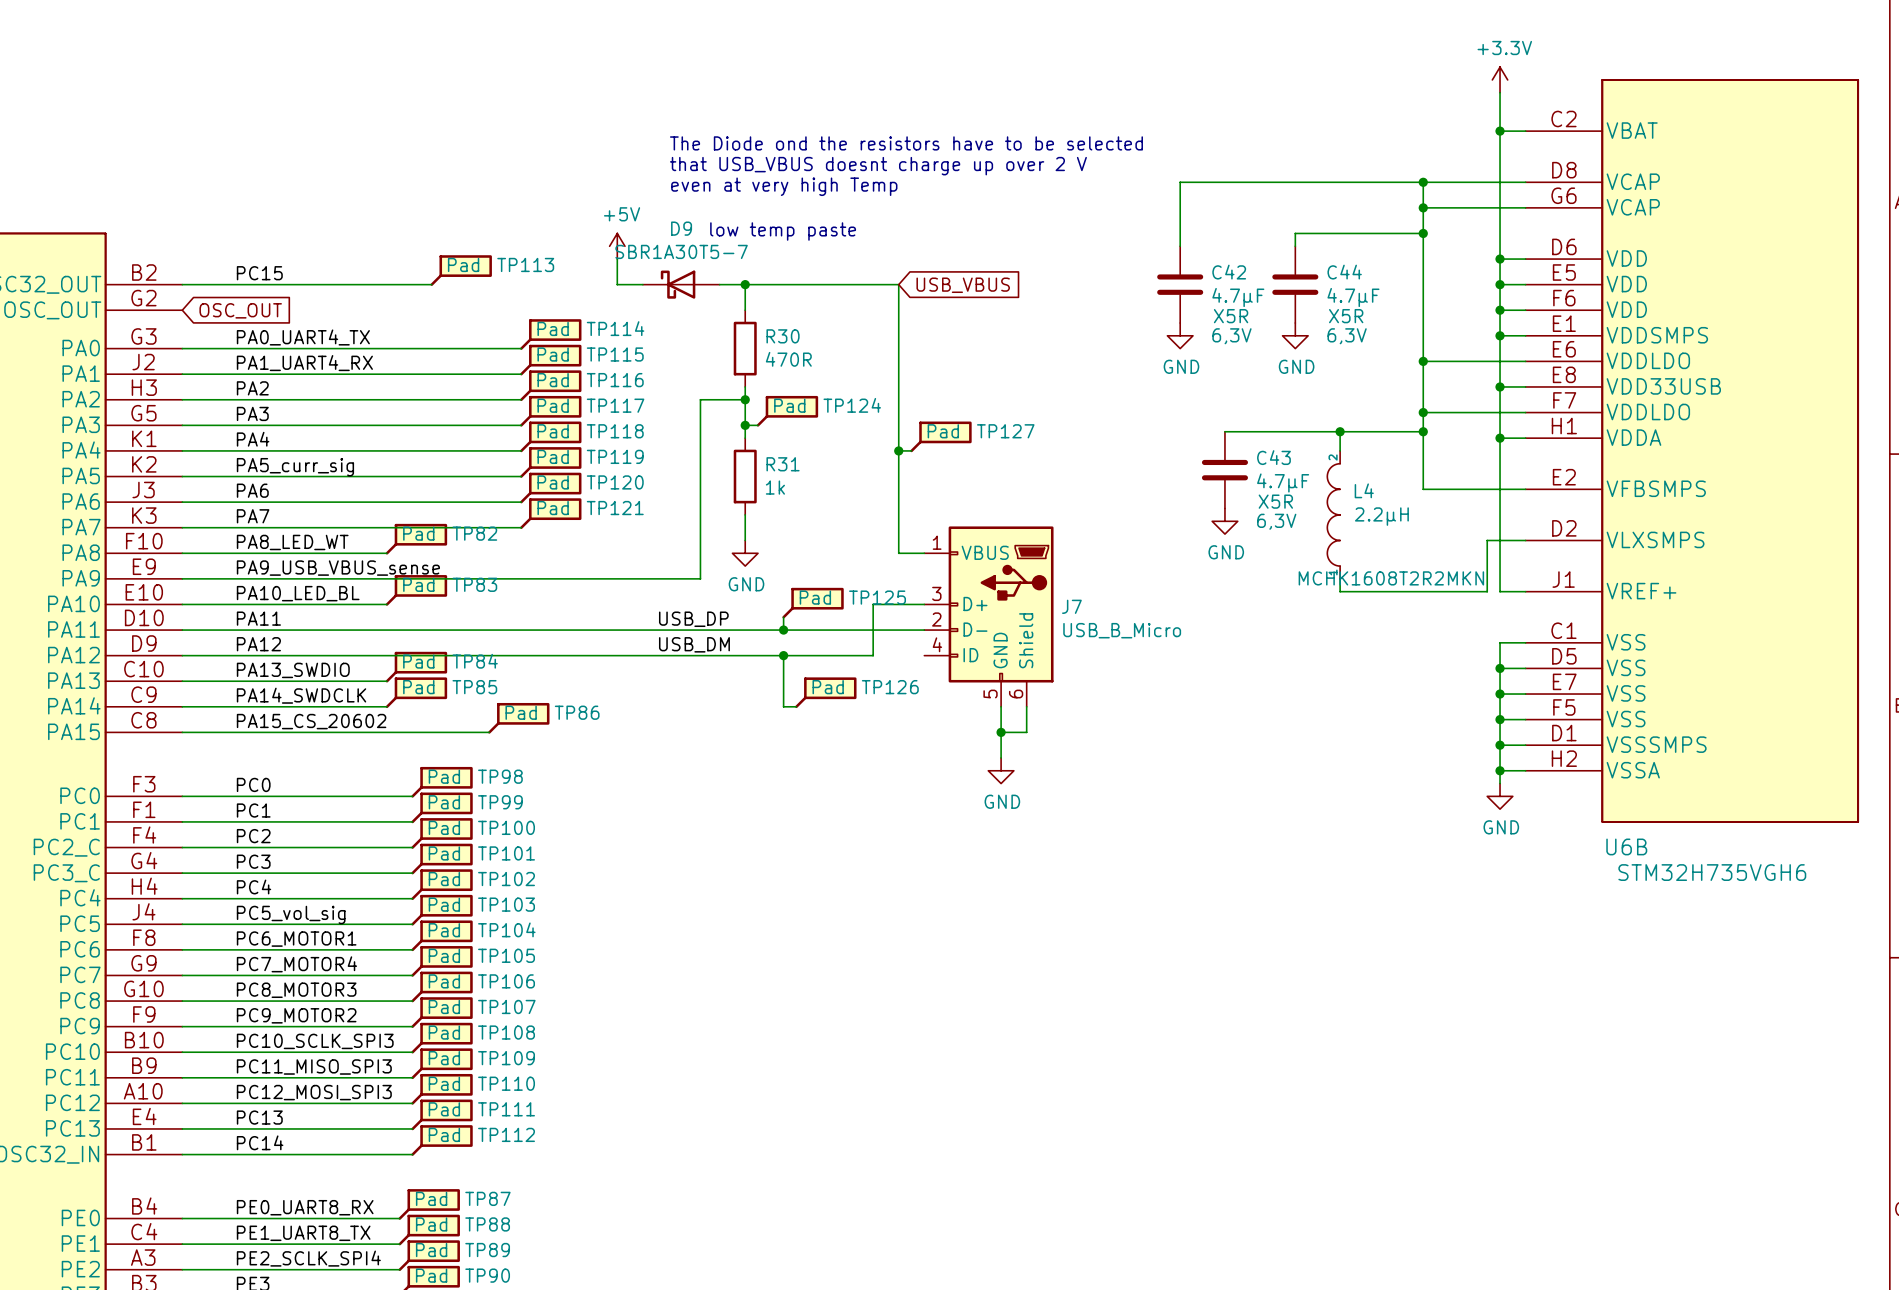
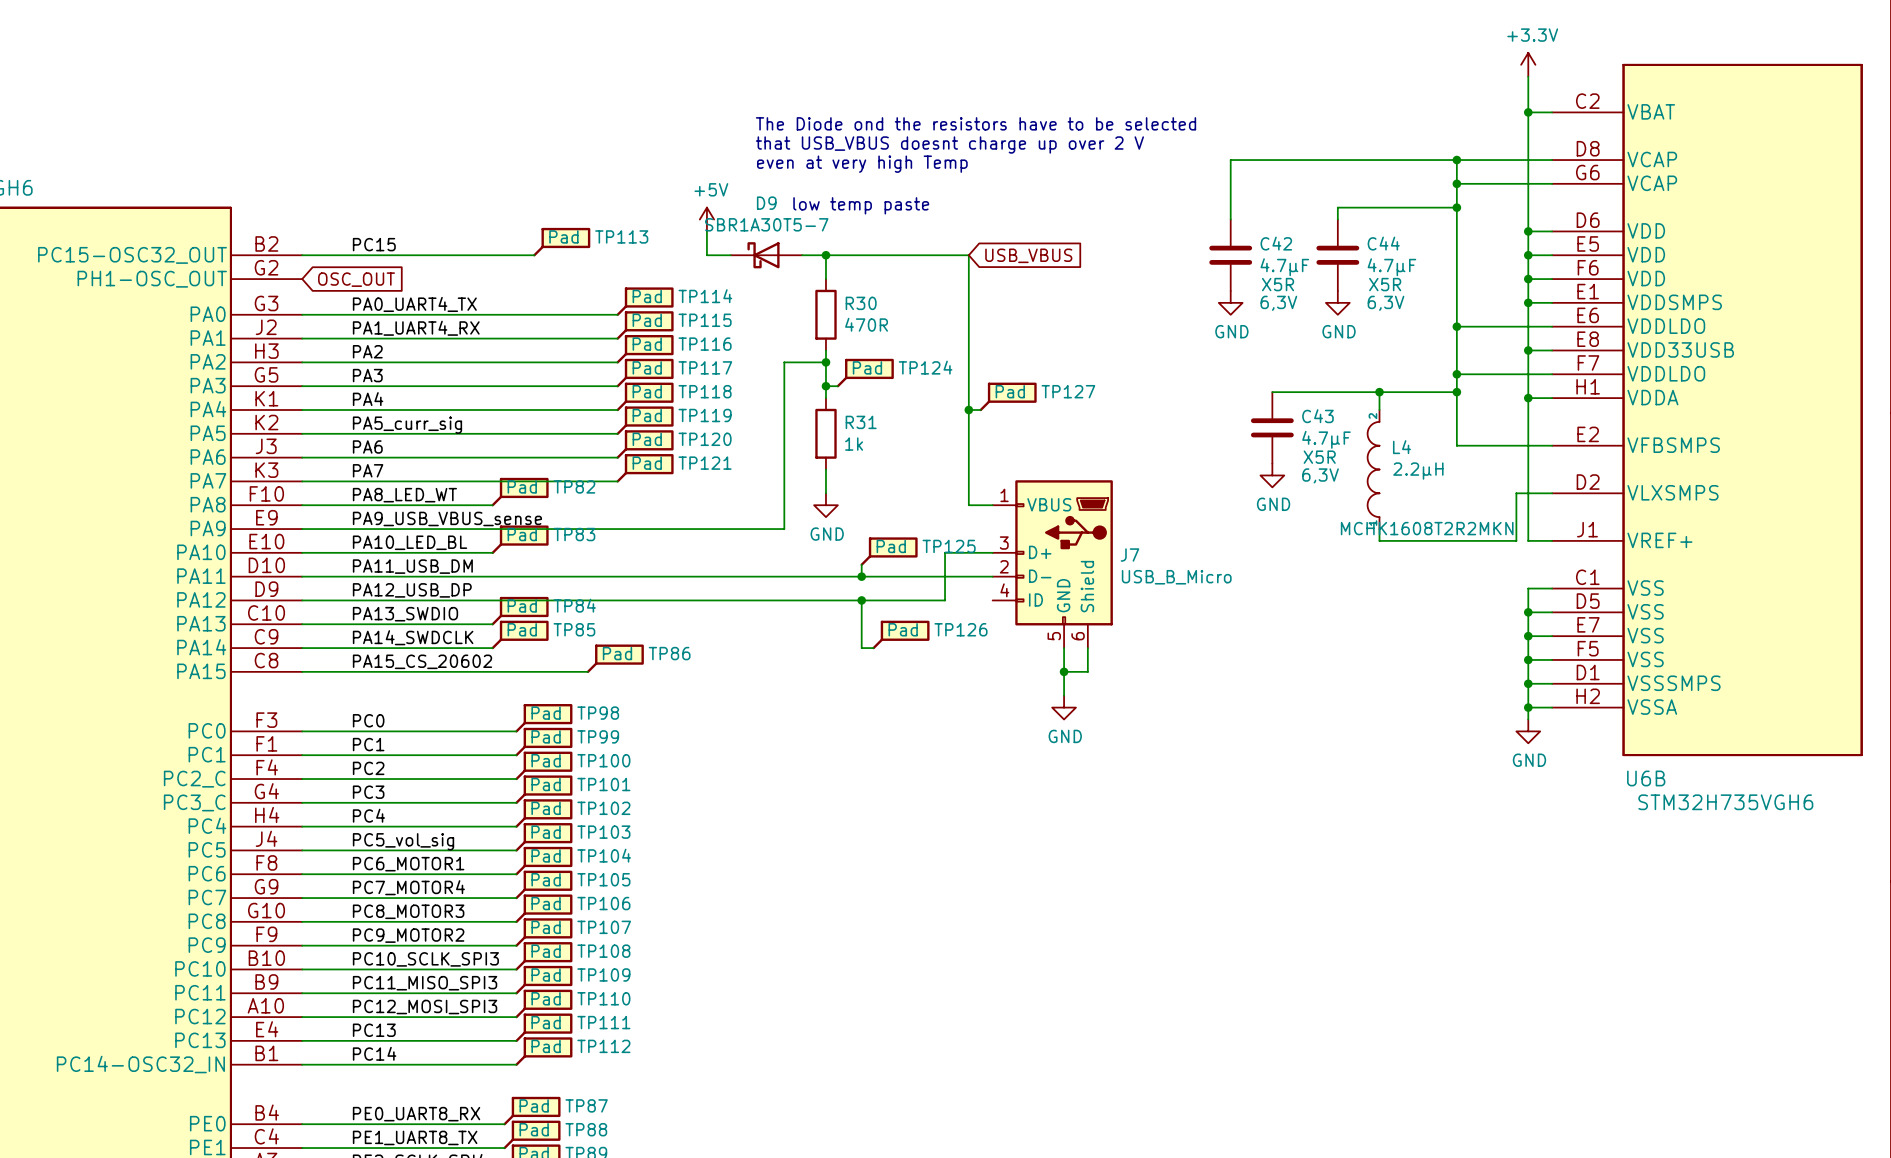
label: PA11 (258, 618) -> PA11_USB_DM (412, 566)
label: USB_DP (693, 619) -> none
label: PA12 (258, 644) -> PA12_USB_DP (412, 590)
label: USB_DM (694, 644) -> none

